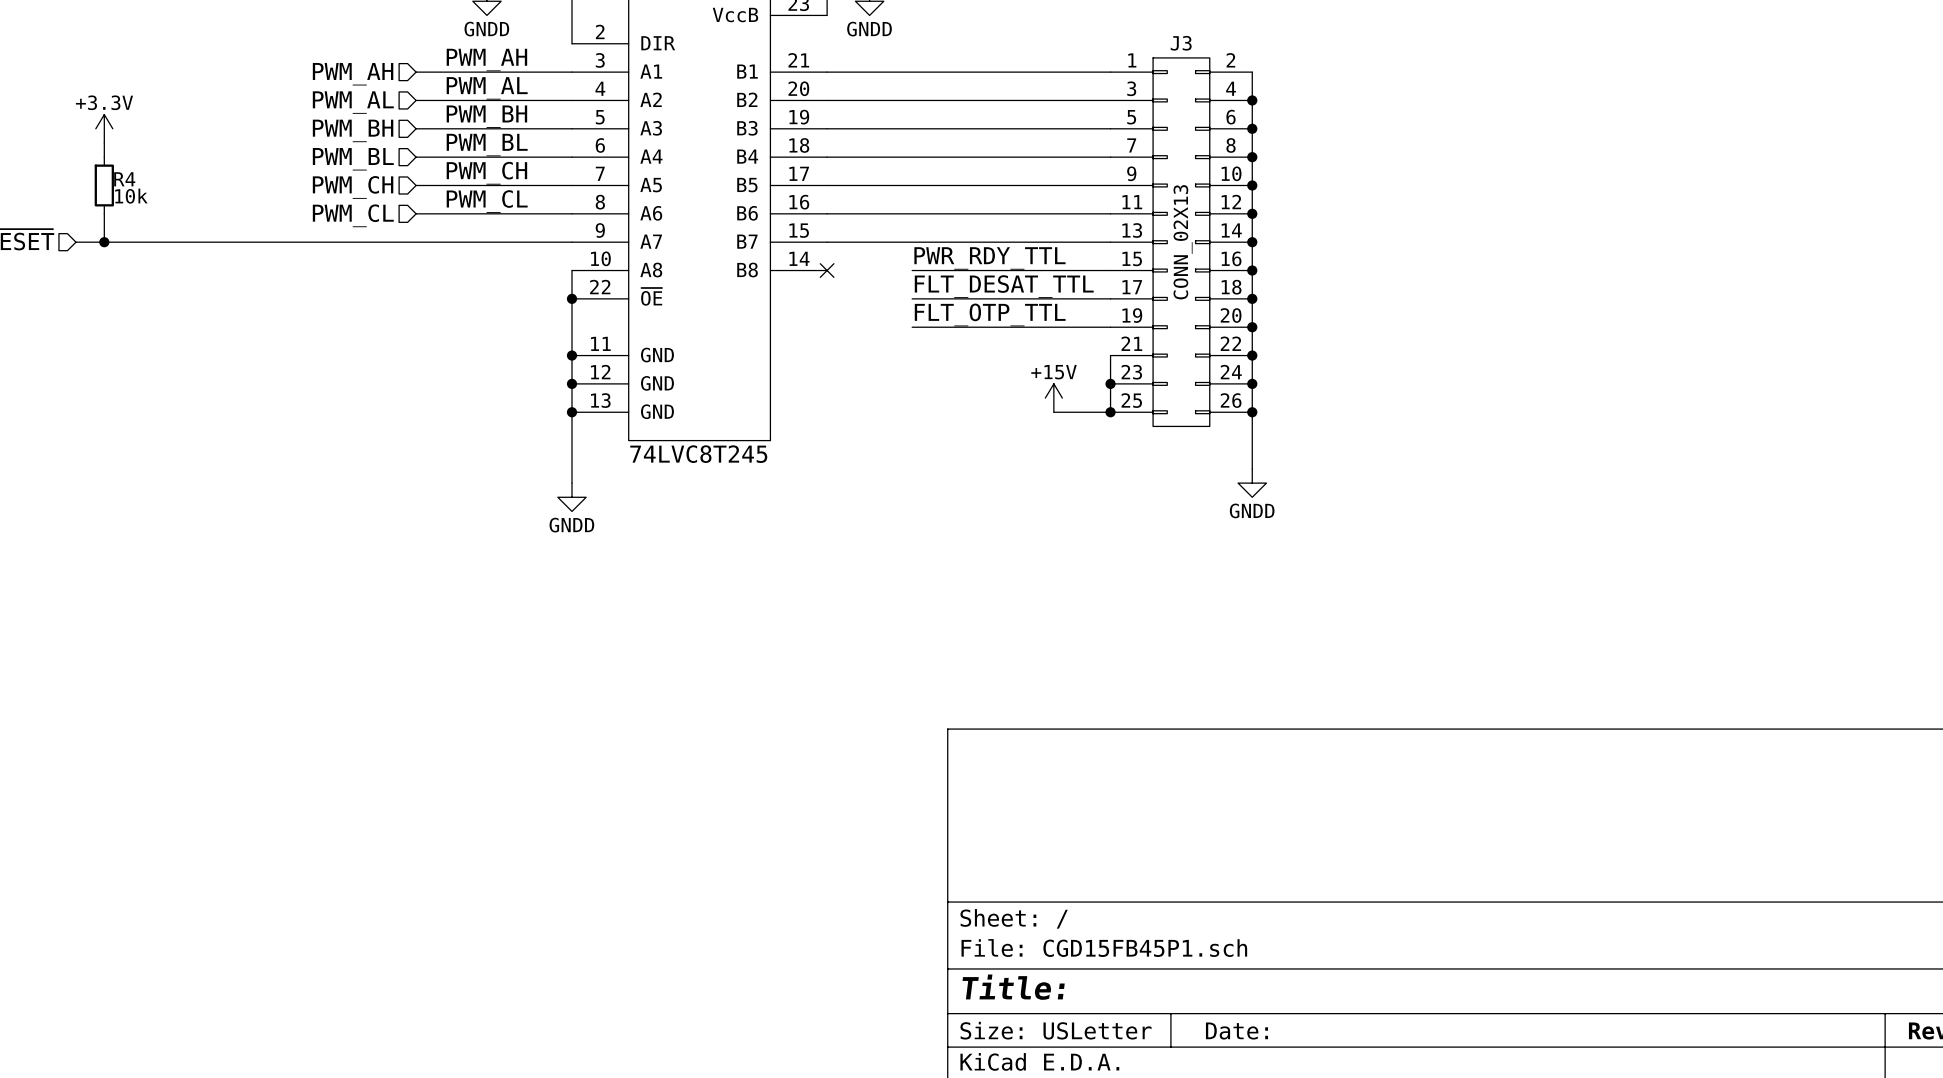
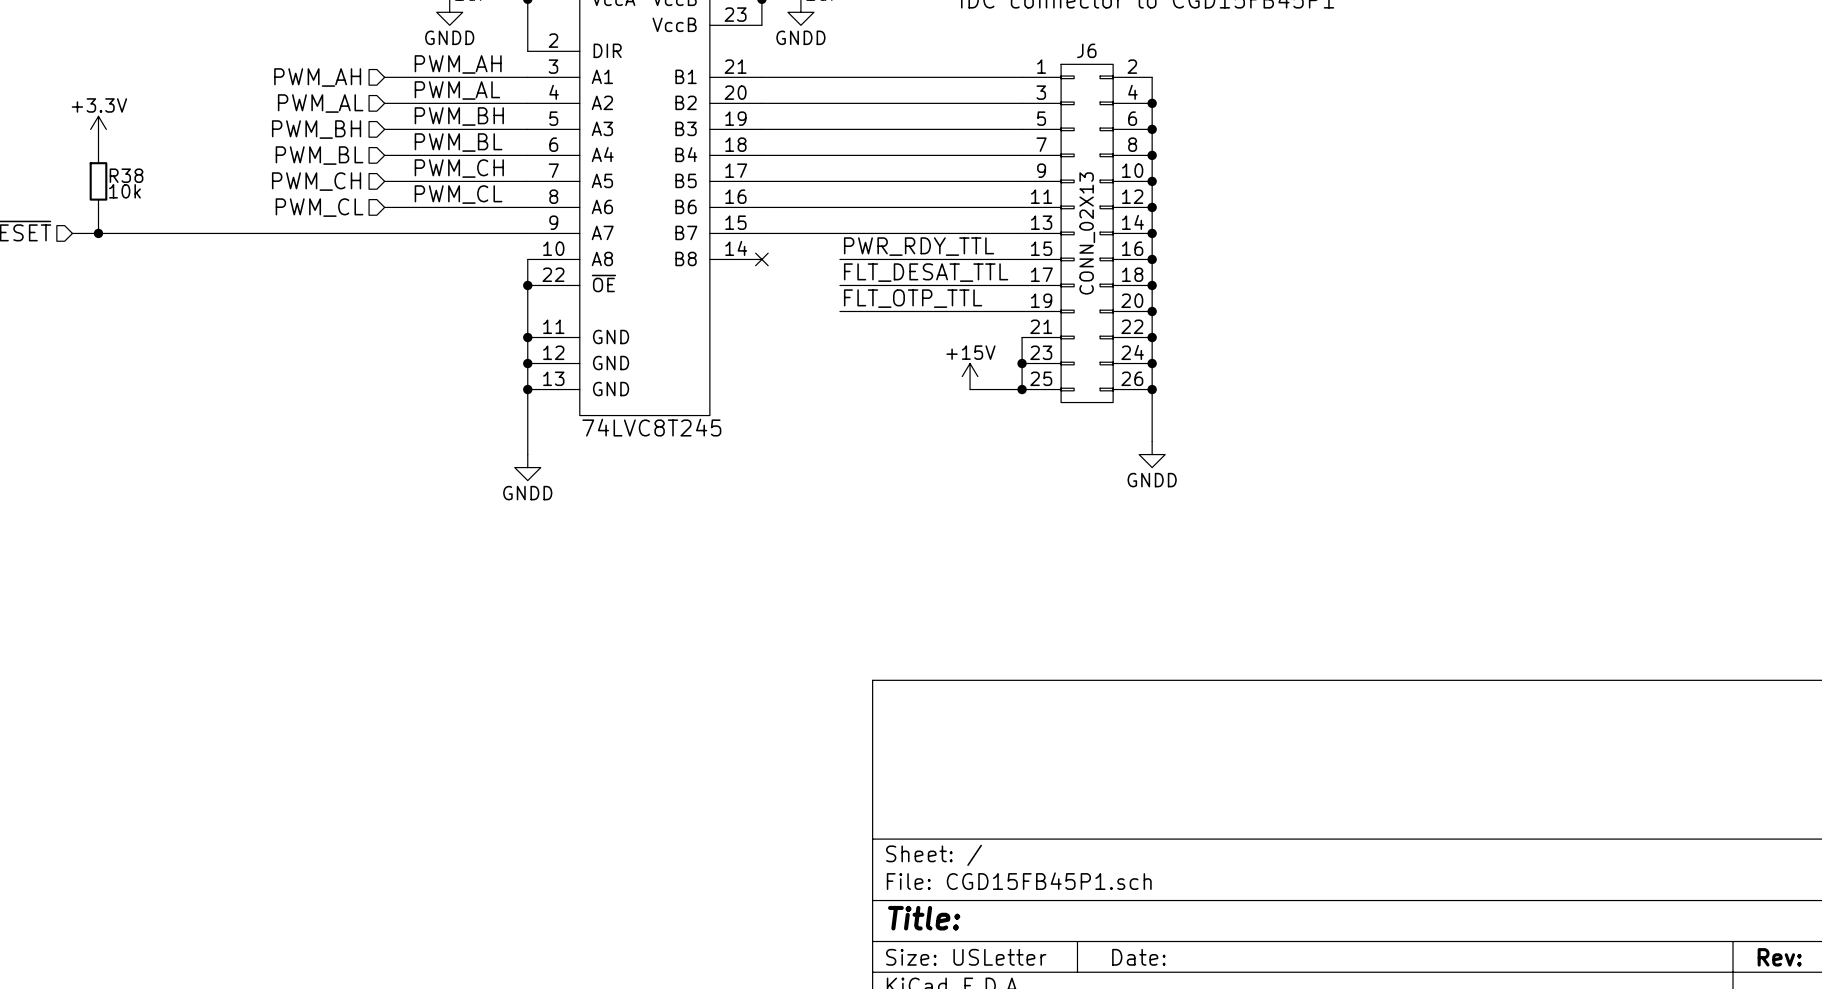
J3 name: J3 (1181, 43) -> J6 (1086, 50)
R4 name: R4 (124, 179) -> R38 (126, 175)

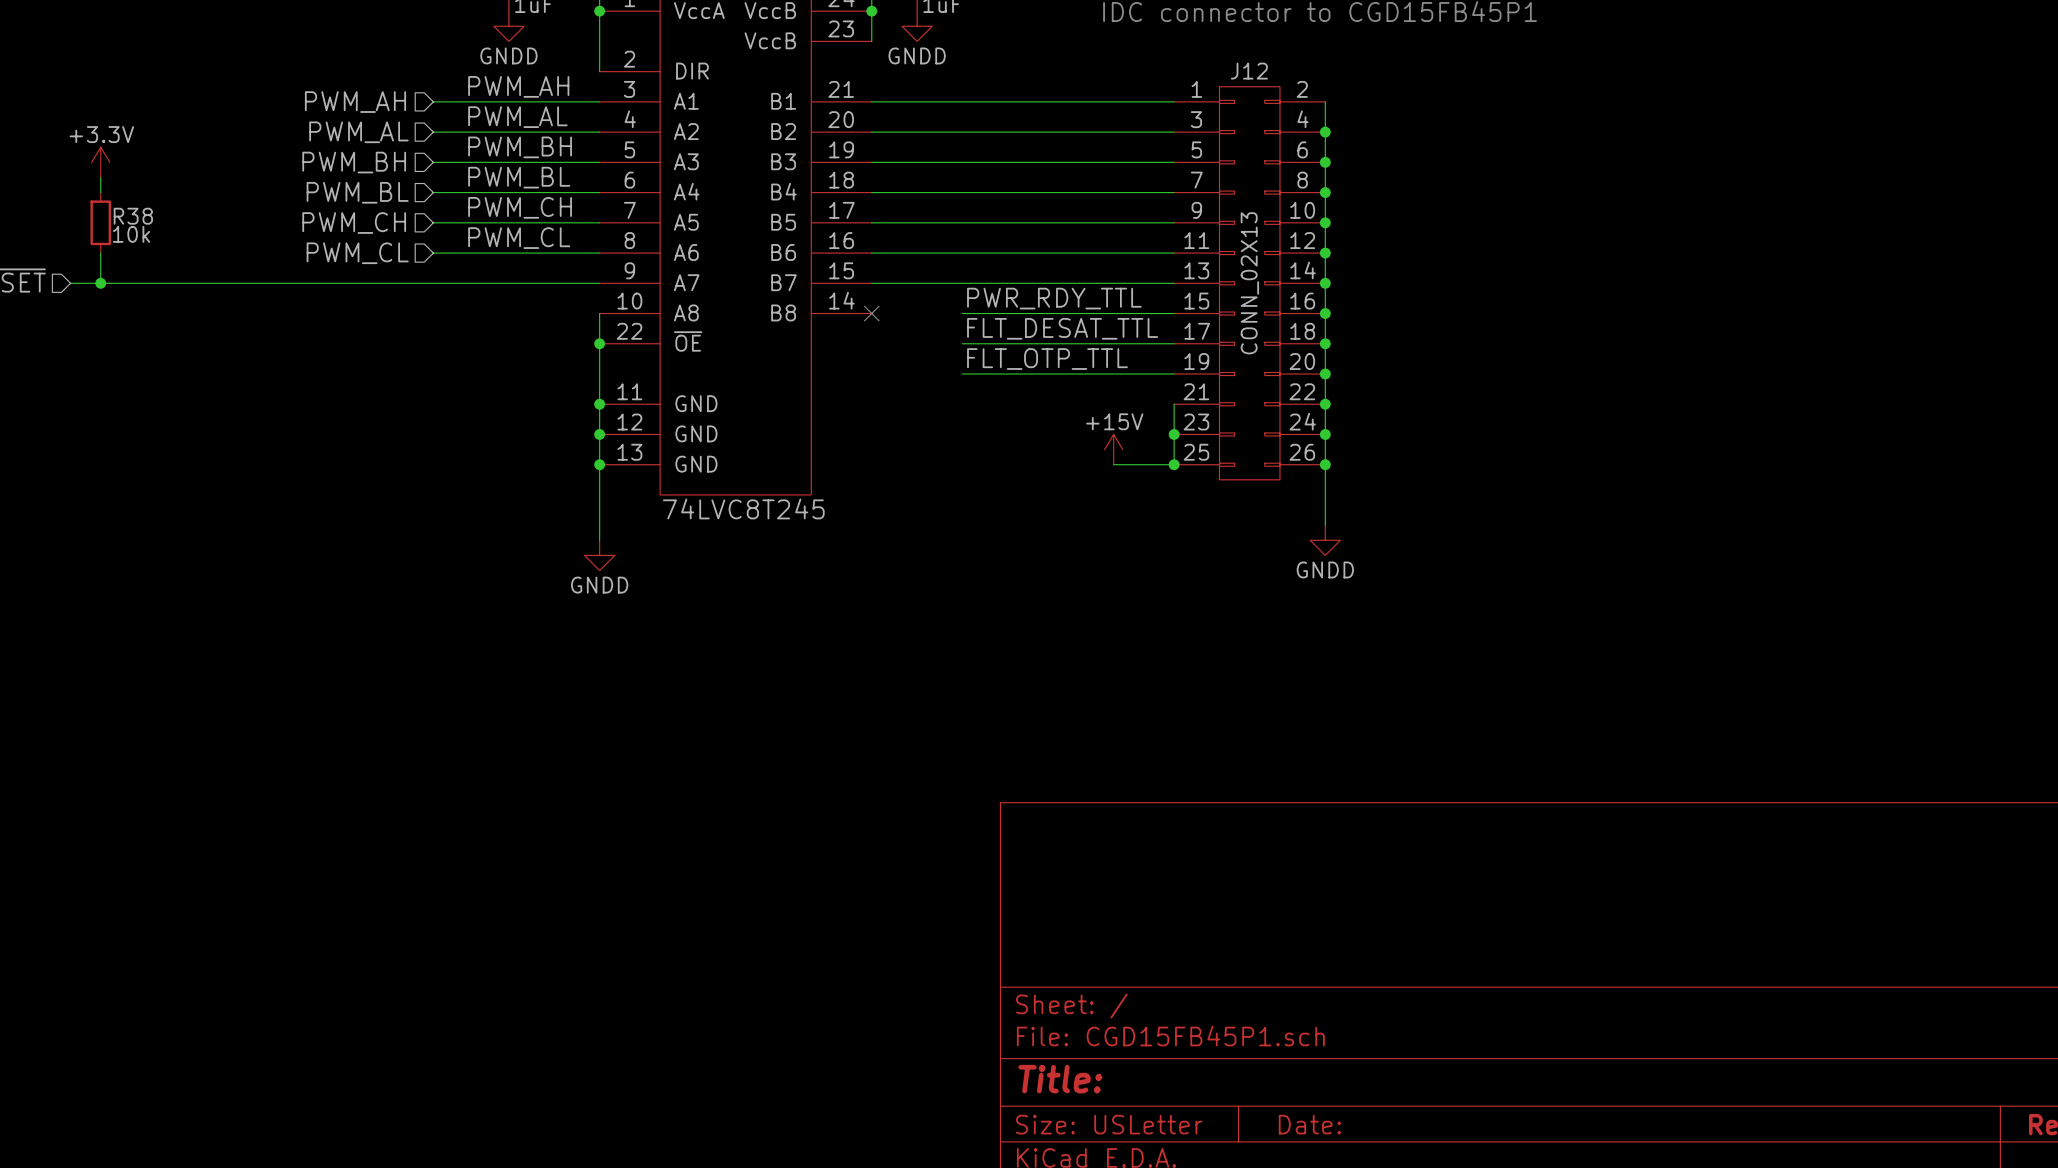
J6 name: J6 (1086, 50) -> J12 (1249, 71)

